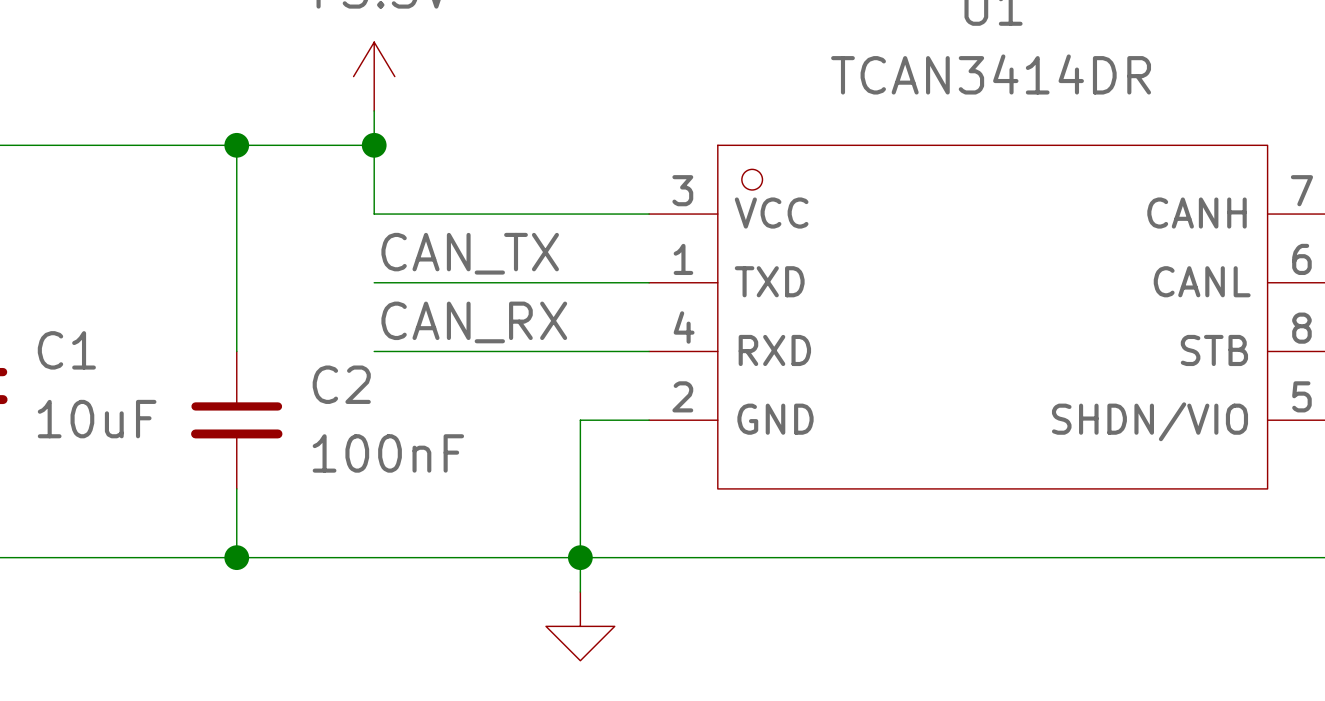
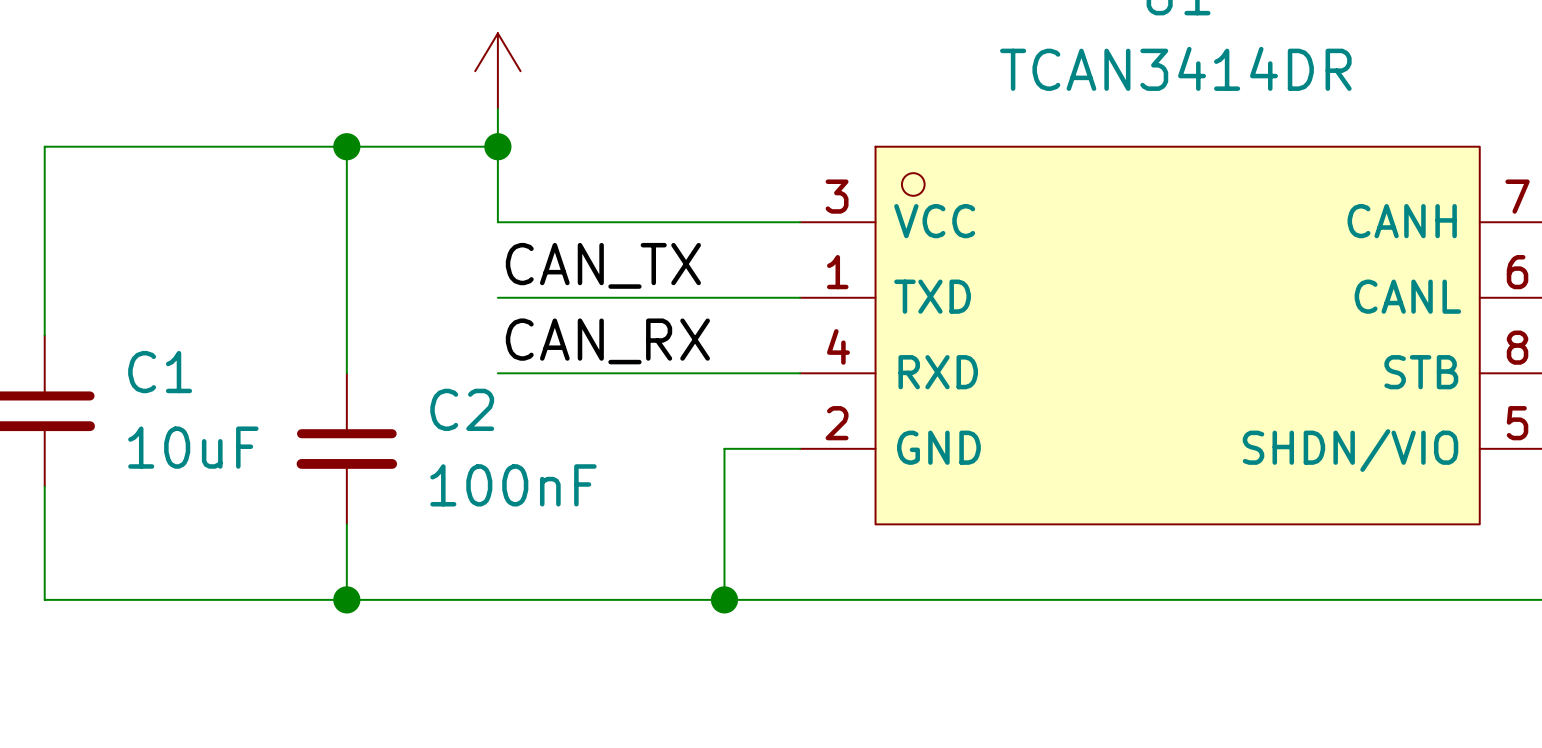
wire: (580, 557) (580, 592) -> none
power symbol: (580, 626) -> none

